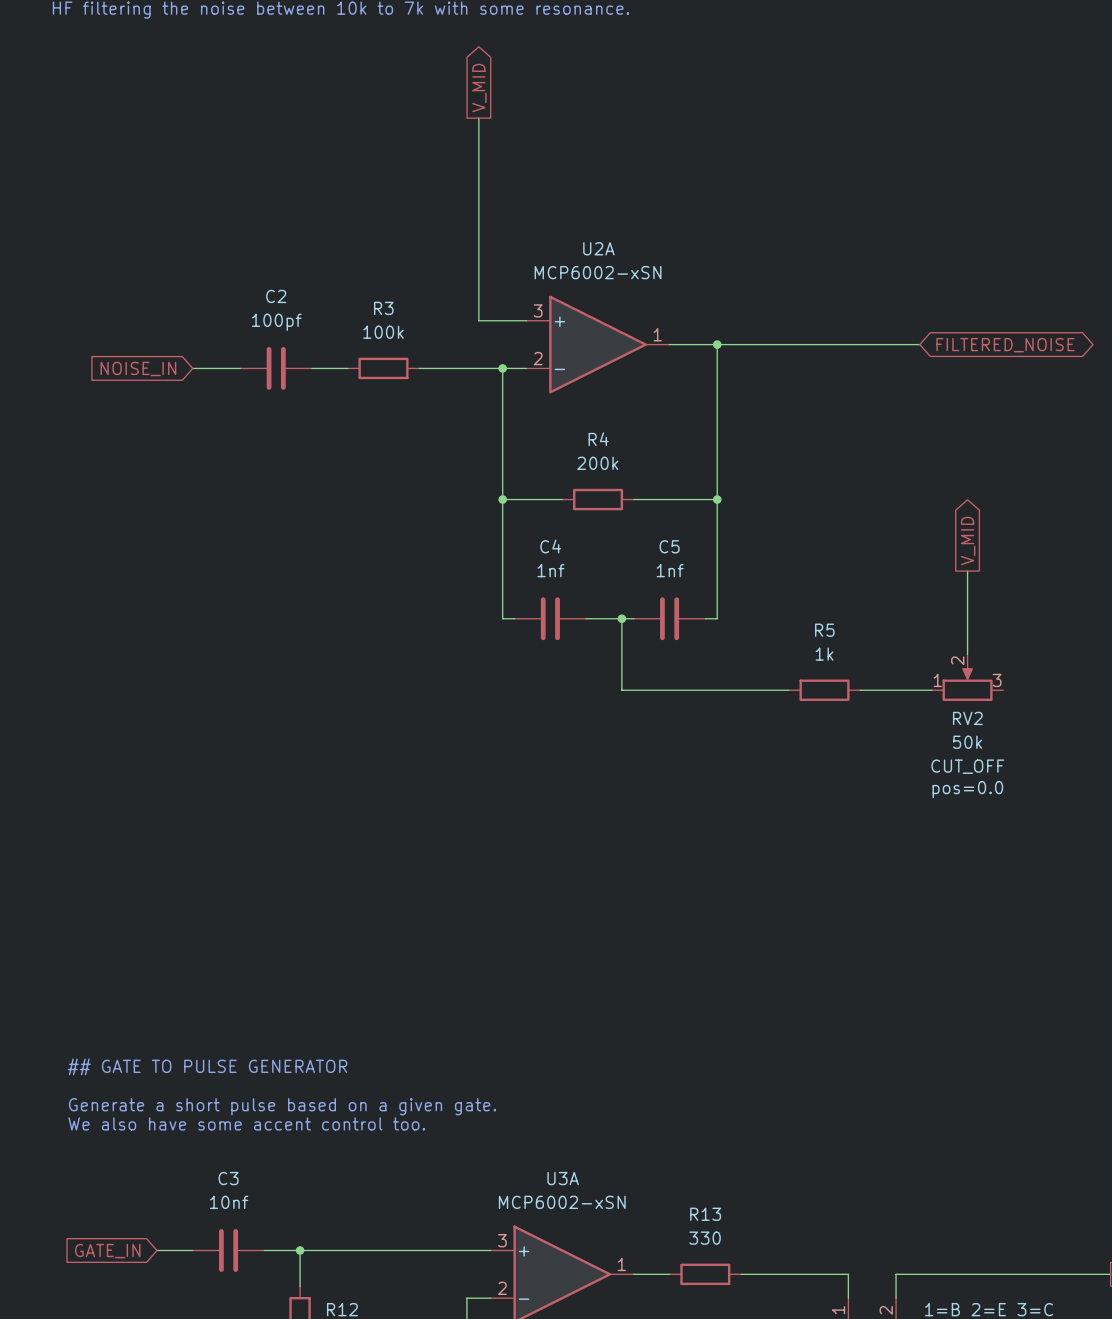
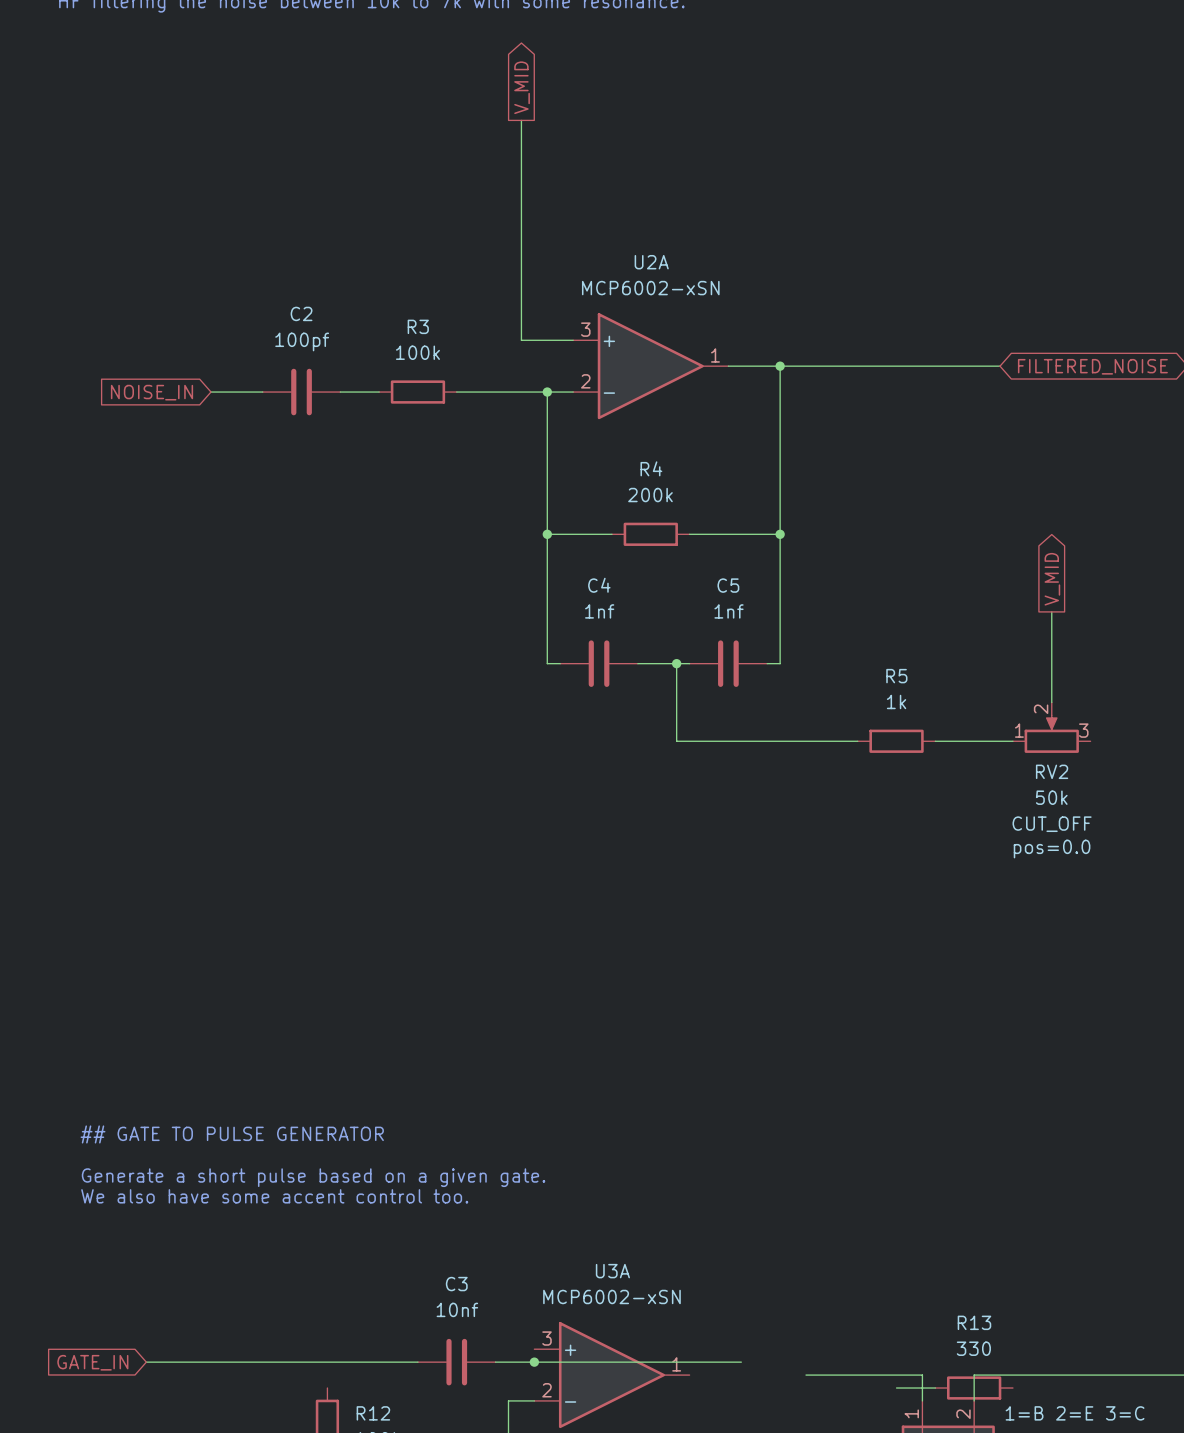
text position: ## GATE TO PULSE GENERATOR (207, 1066) -> ## GATE TO PULSE GENERATOR (232, 1134)
text position: Generate a short pulse based on a given gate. (282, 1106) -> Generate a short pulse based on a given gate. (313, 1177)
text position: We also have some accent control too. (246, 1123) -> We also have some accent control too. (274, 1196)
wire: (157, 1250) (192, 1250) -> none
C3 position: (228, 1250) -> (456, 1362)
wire: (264, 1250) (490, 1250) -> (495, 1362) (741, 1362)
wire: (300, 1250) (300, 1286) -> none
junction: (300, 1250) -> none
global label position: GATE_IN (107, 1251) -> GATE_IN (92, 1362)
wire: none -> (146, 1362) (417, 1362)
junction: none -> (534, 1362)
wire: (633, 1274) (669, 1274) -> (896, 1388) (935, 1388)
R13 position: (705, 1274) -> (974, 1388)

